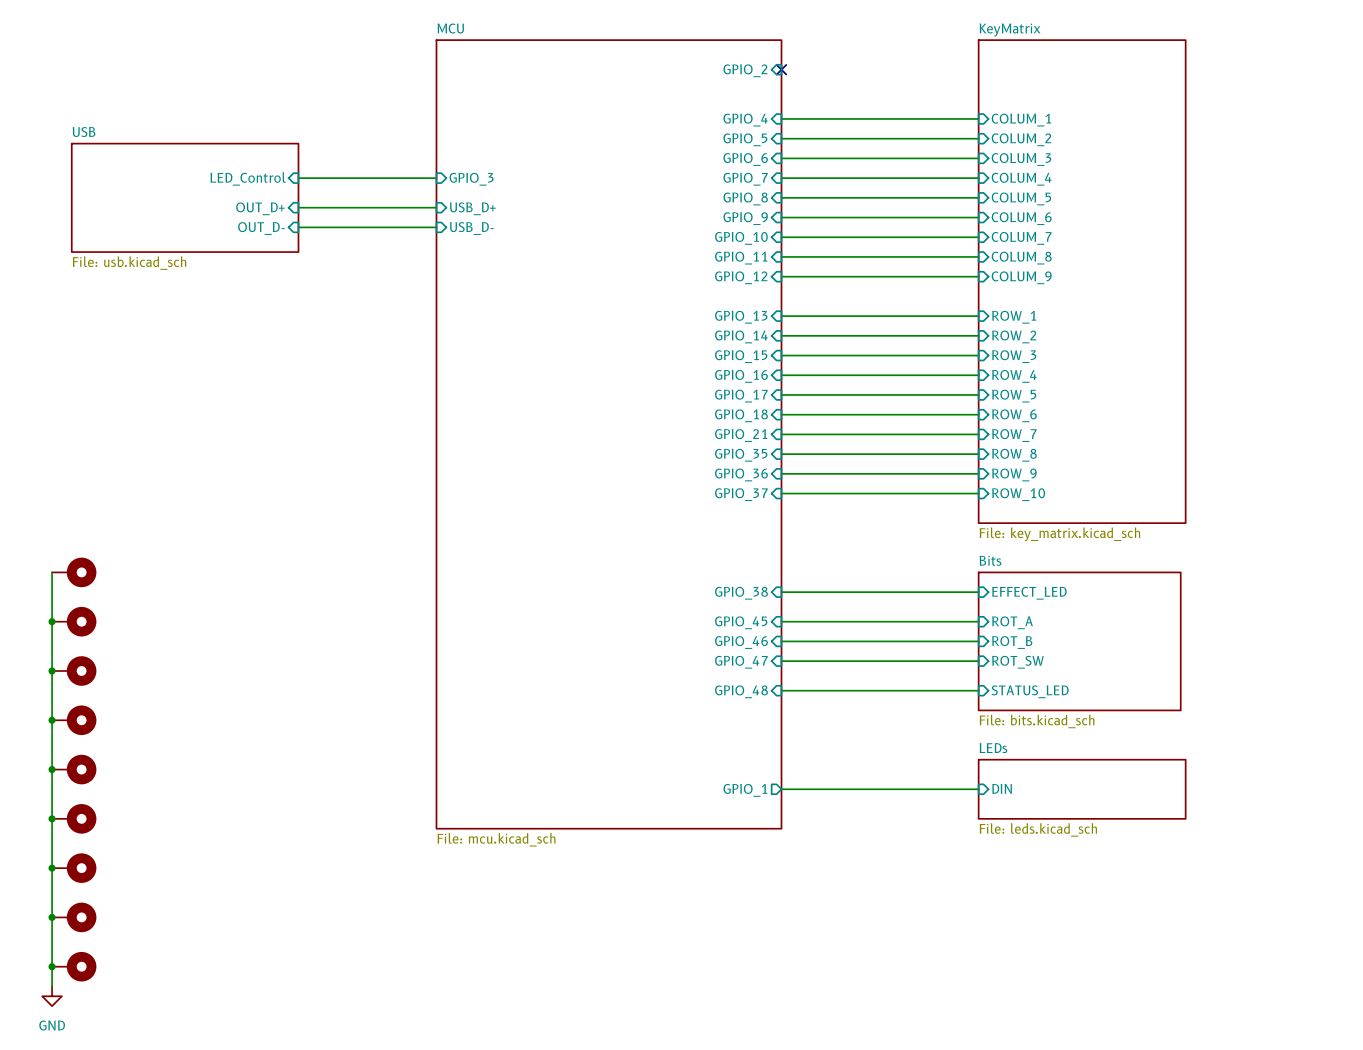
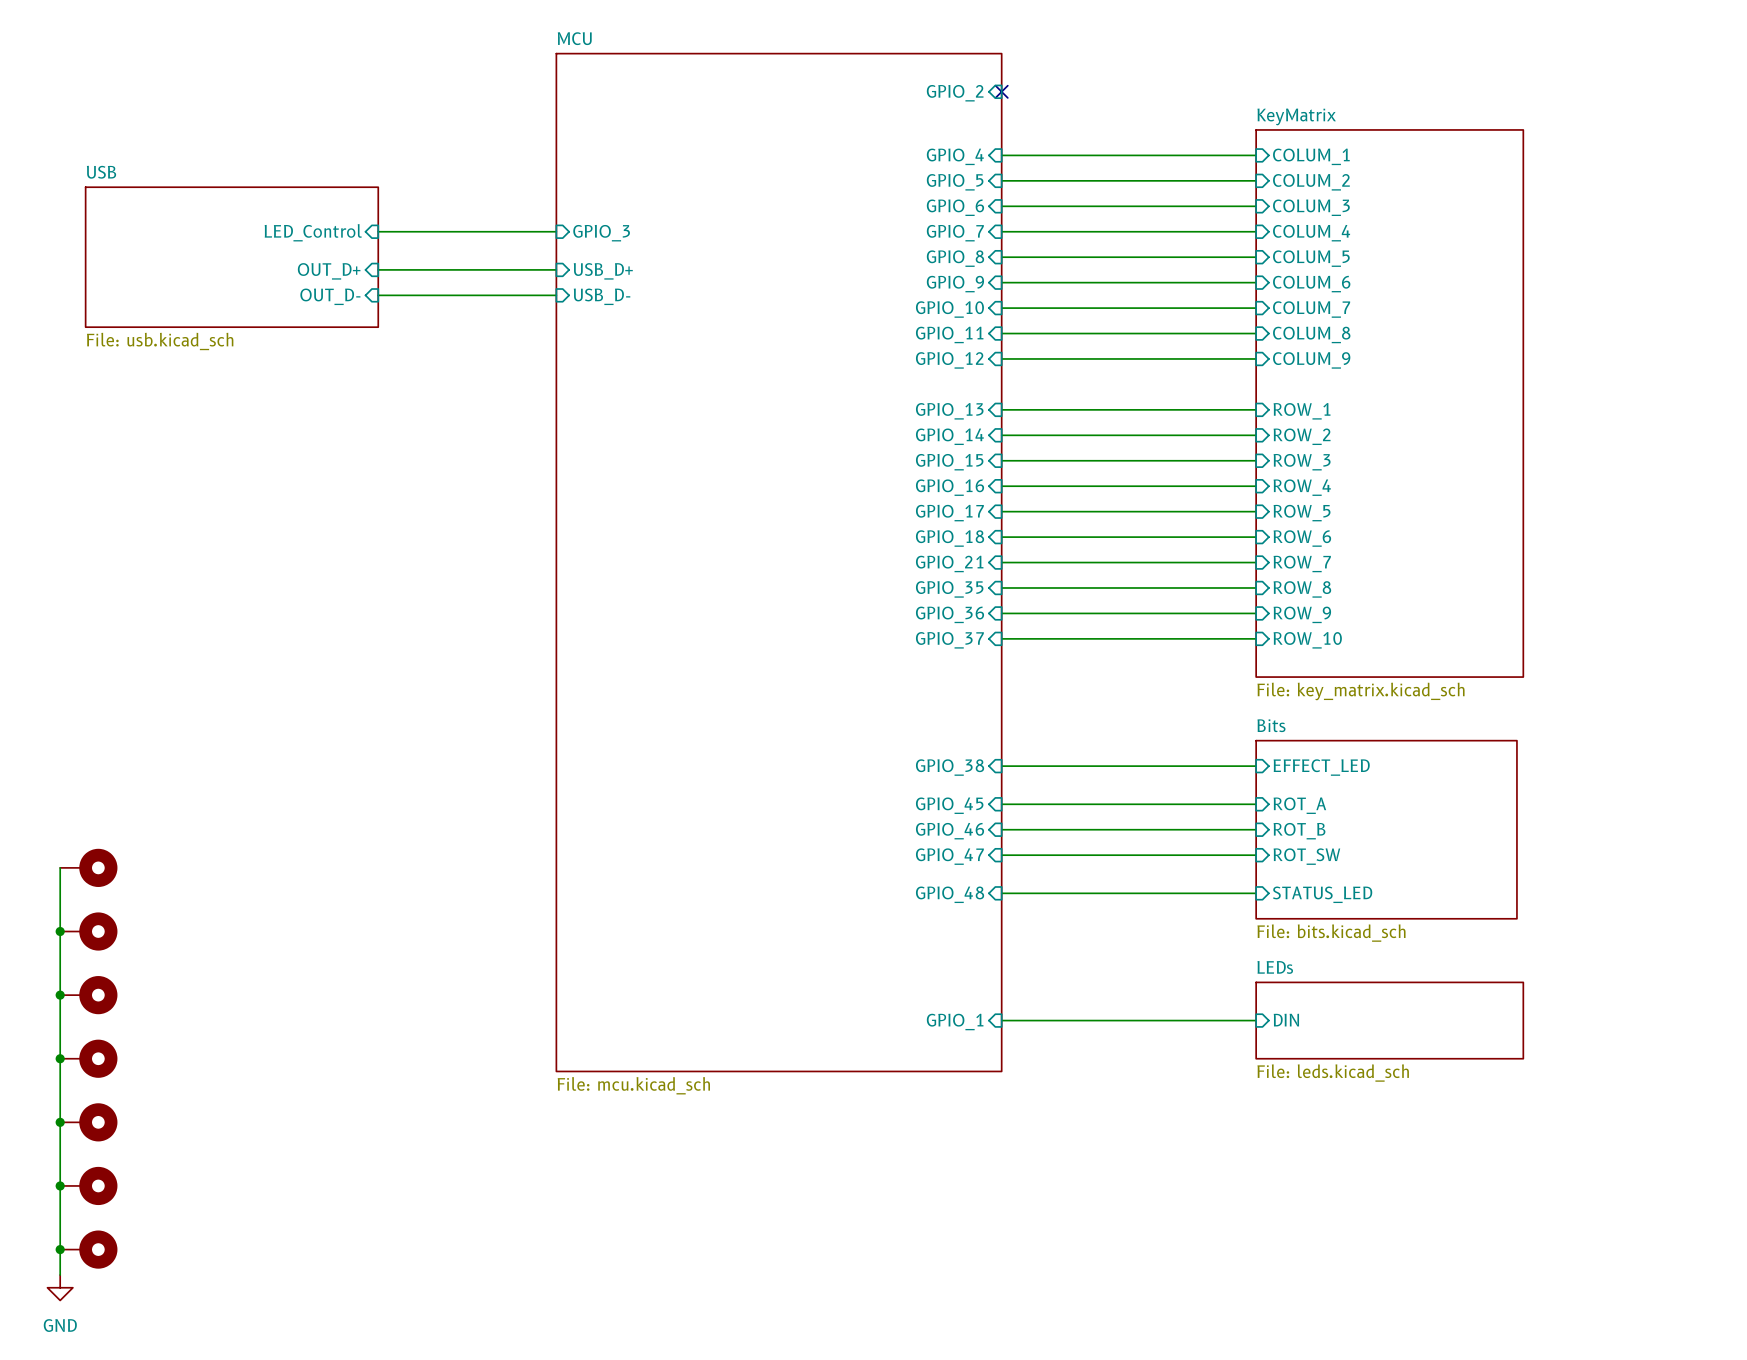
sheet KeyMatrix: File: key_matrix.kicad_sch (1082, 281) -> none
sheet KeyMatrix: none -> File: key_matrix.kicad_sch (1389, 403)
wire: (52, 572) (52, 670) -> none
part: (74, 572) -> none
junction: (52, 621) -> none
part: (74, 621) -> none
junction: (52, 670) -> none
sheet pin shape: output (745, 790) -> input (955, 1022)

